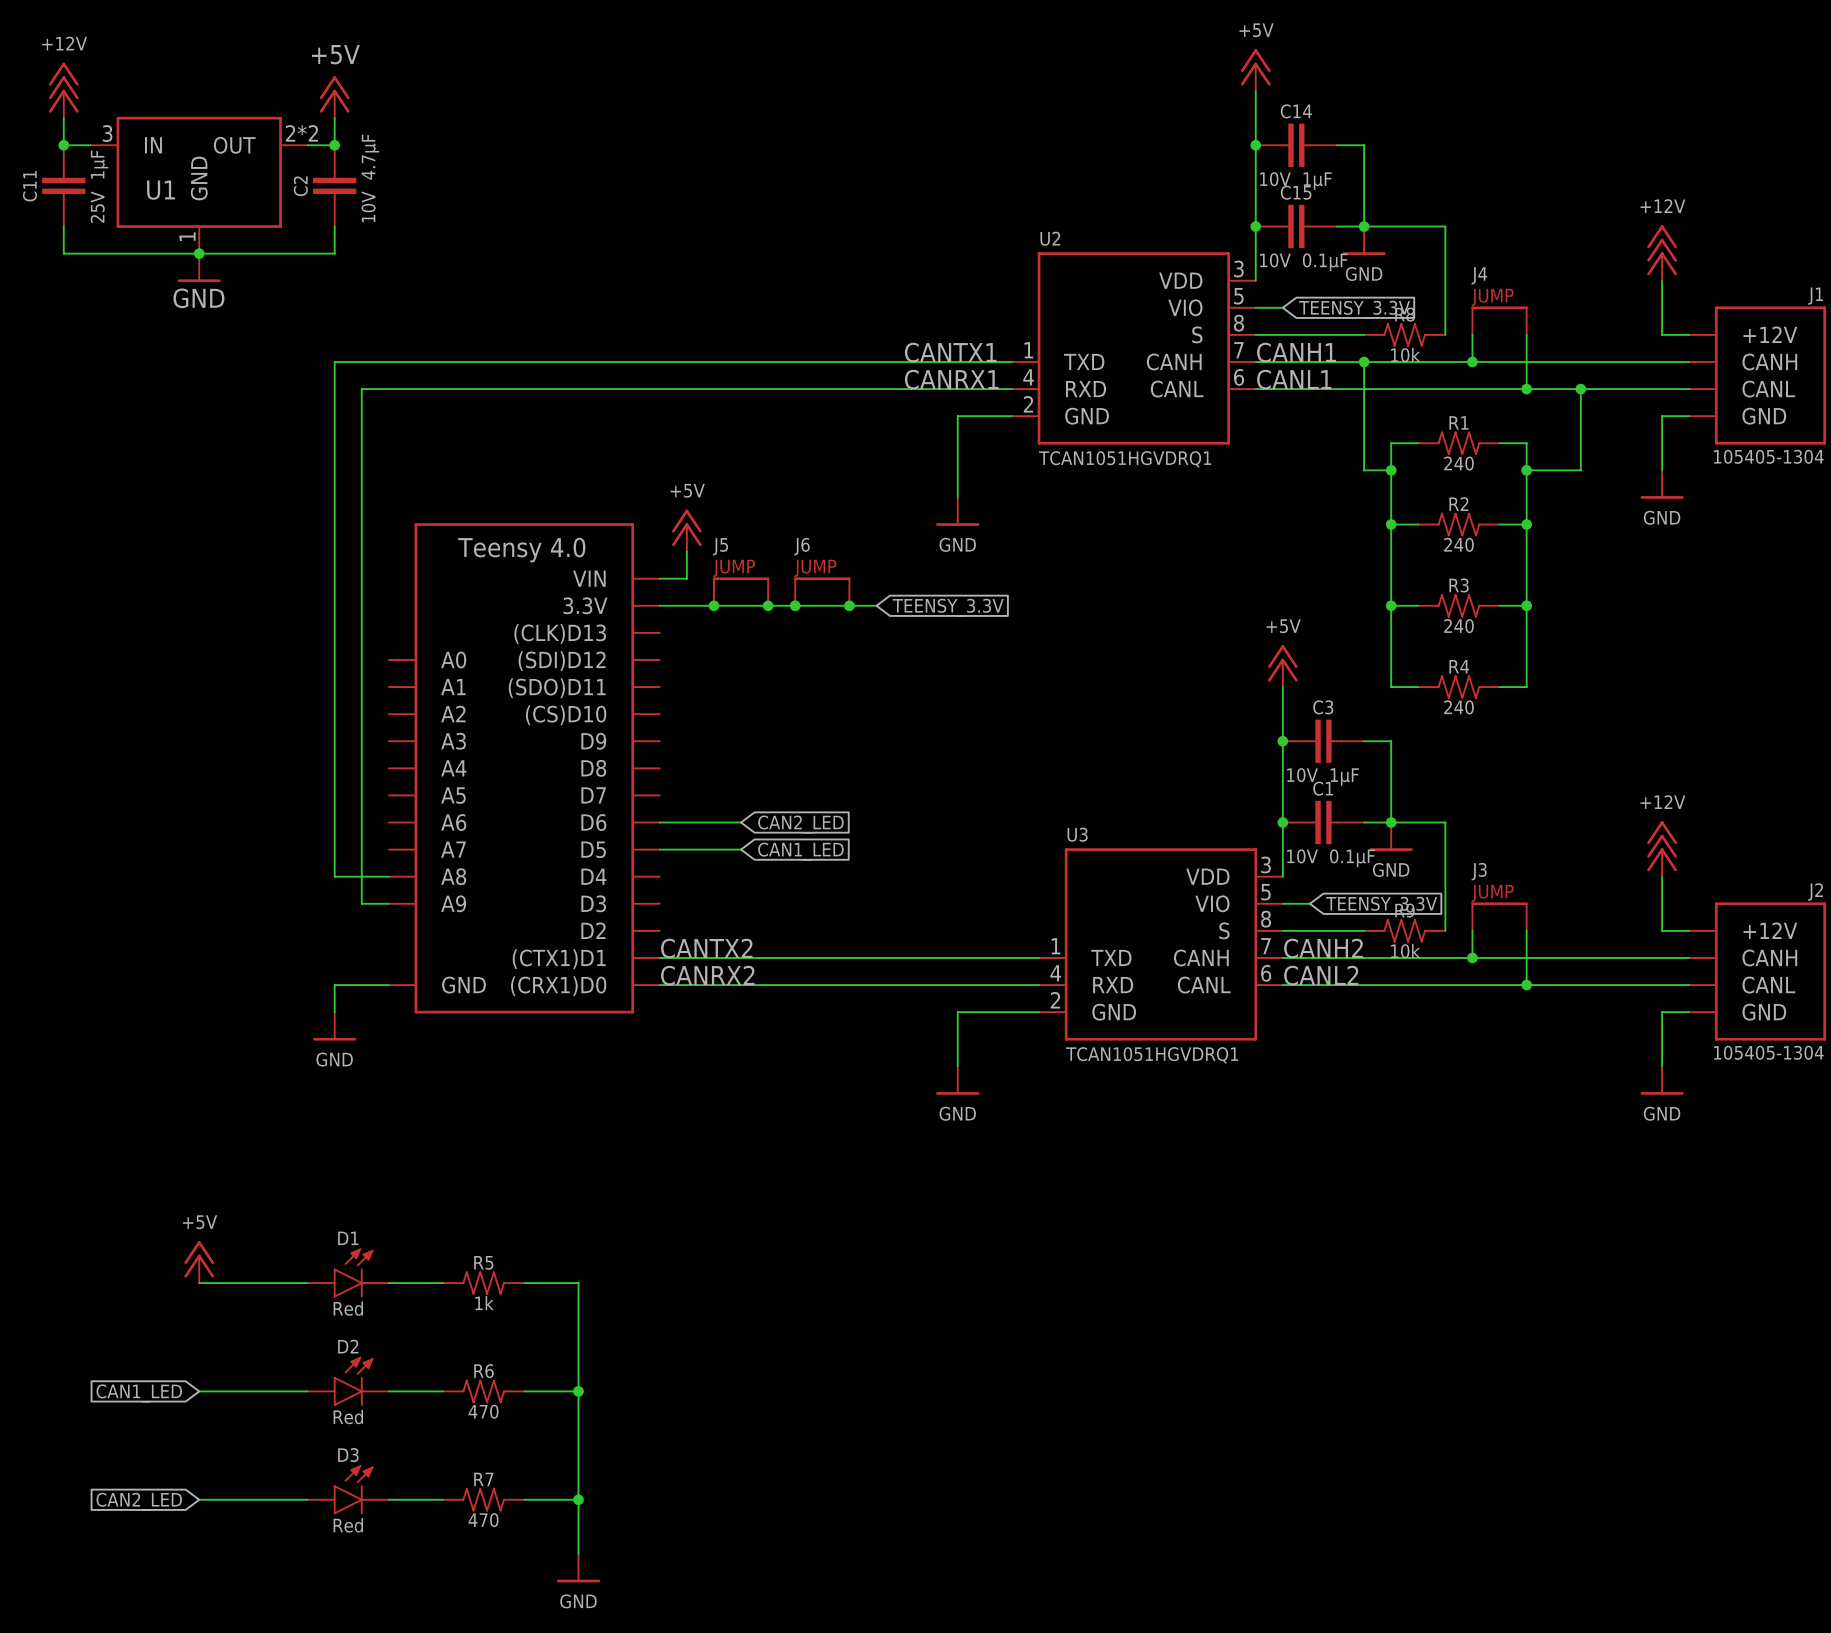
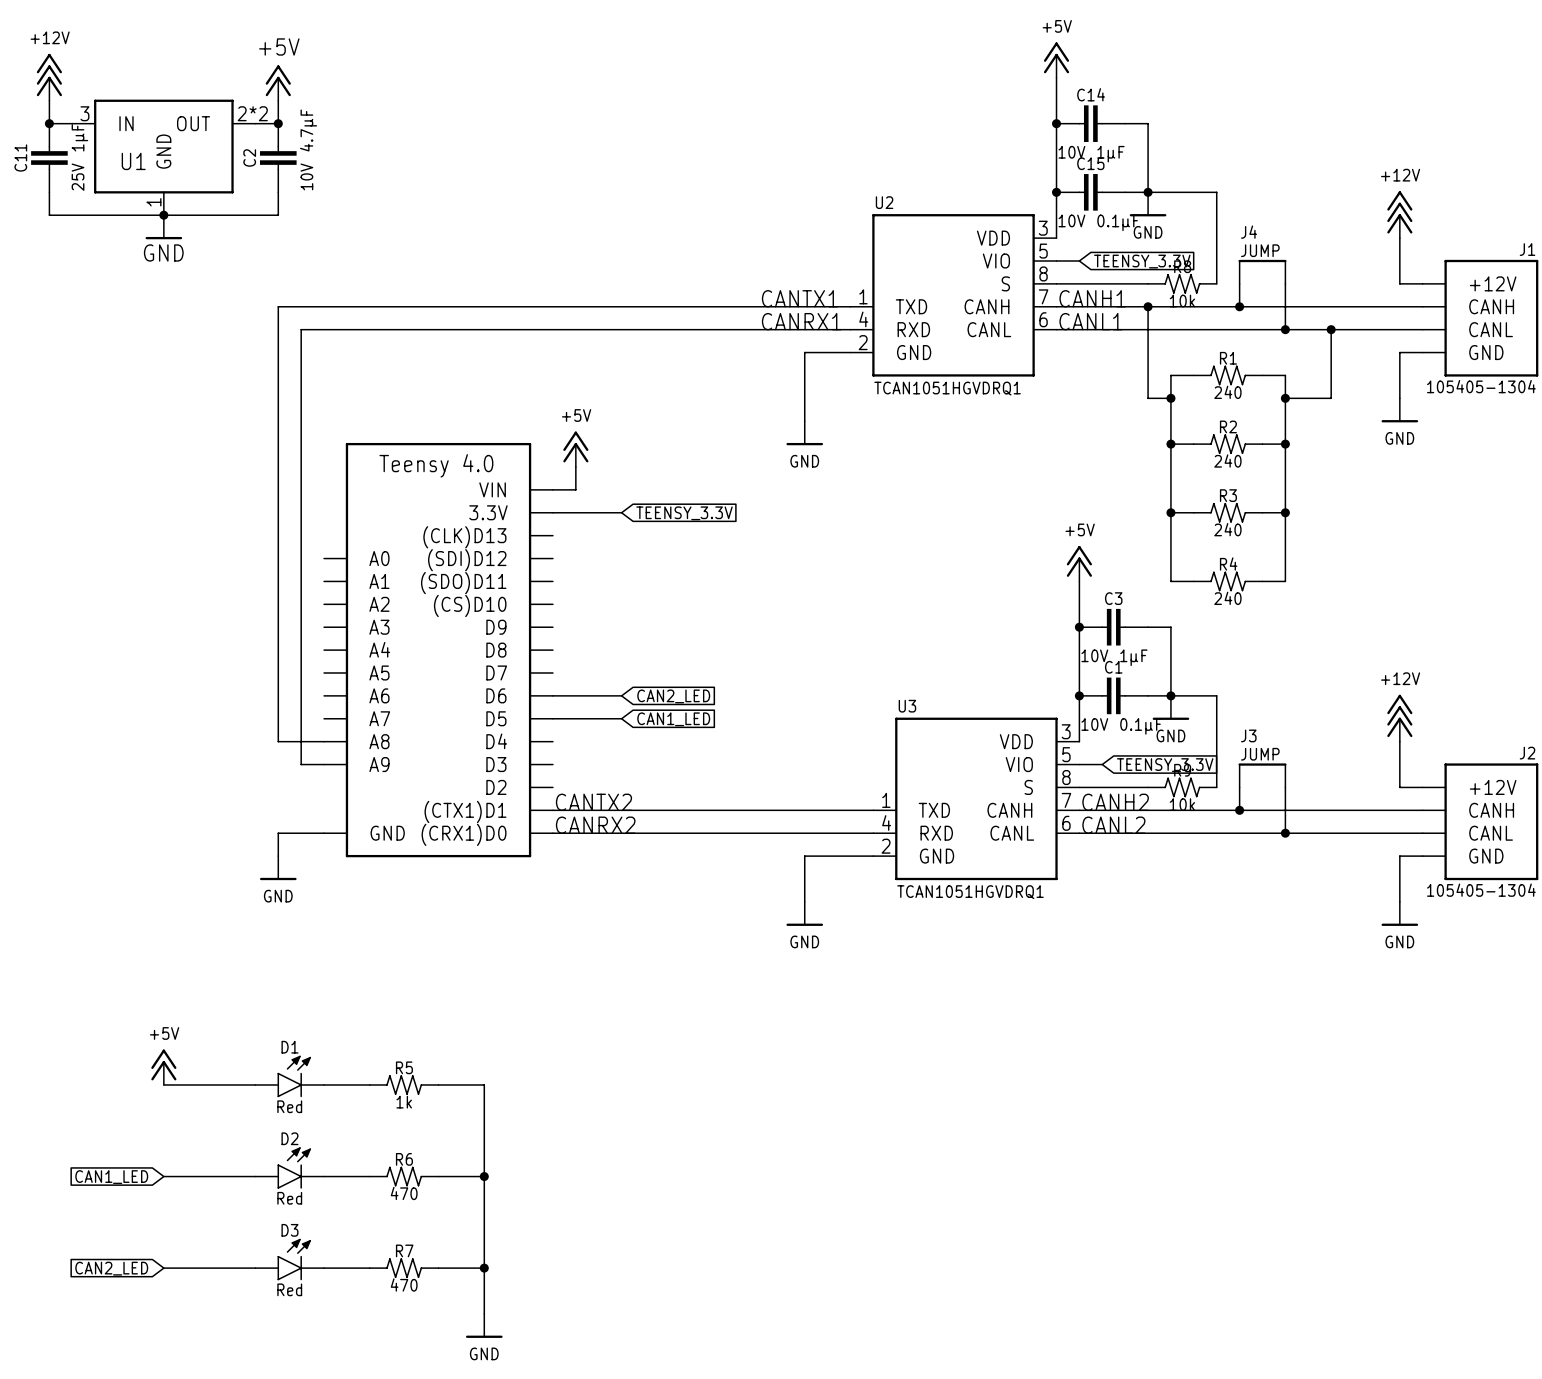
J5: (741, 591) -> none
J6: (822, 591) -> none
junction: (713, 605) -> none
wire: (741, 605) (876, 605) -> none
junction: (768, 605) -> none
junction: (795, 605) -> none
junction: (849, 605) -> none
global label position: TEENSY_3.3V (948, 607) -> TEENSY_3.3V (684, 513)

